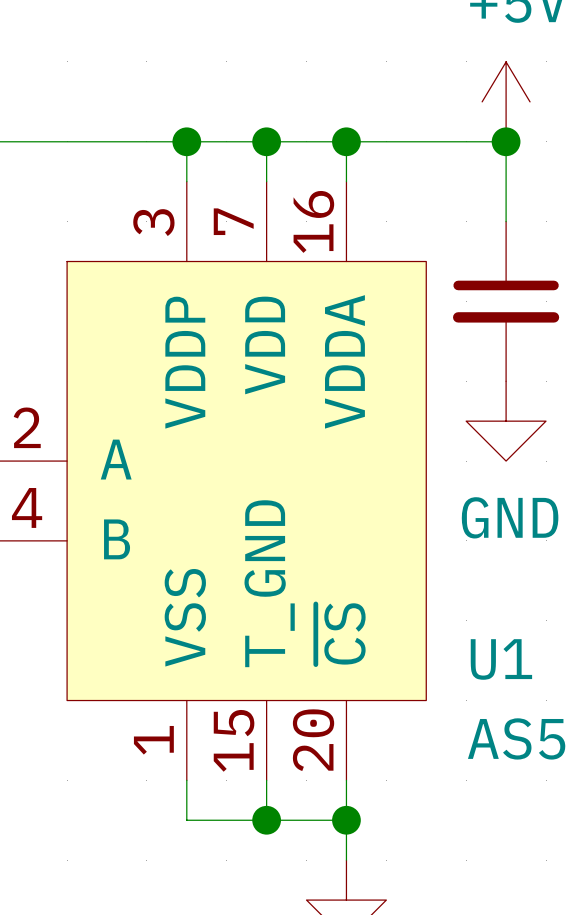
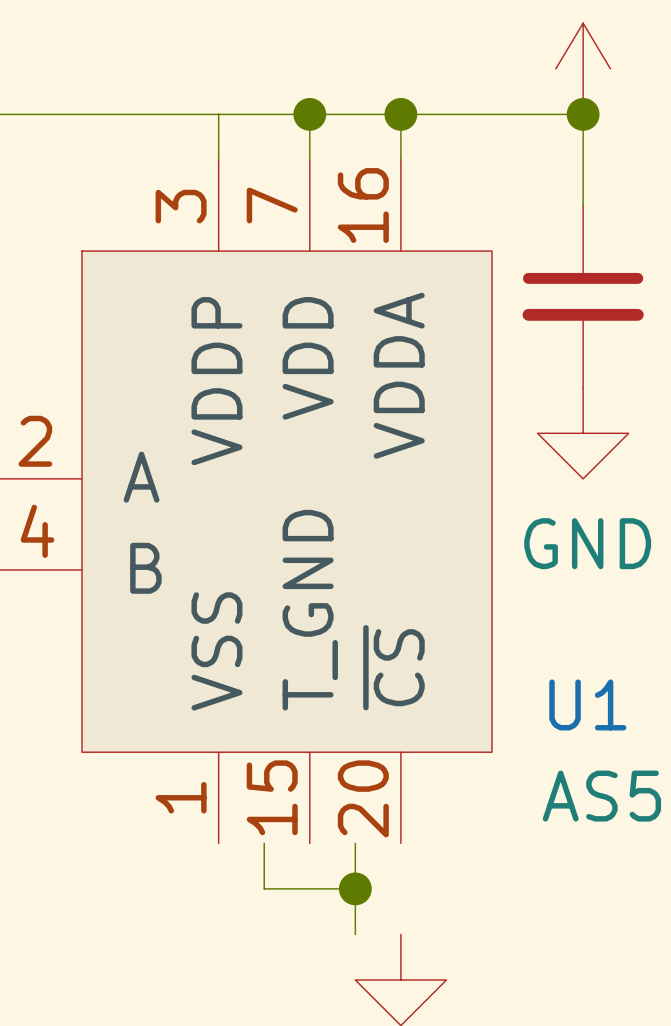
junction: (186, 141) -> none
wire: (186, 780) (186, 820) (226, 820) -> (264, 843) (264, 888)
wire: (266, 780) (266, 820) -> none
wire: (346, 780) (346, 860) -> (355, 843) (355, 934)
junction: (266, 820) -> none
wire: (306, 820) (346, 820) -> none
junction: none -> (355, 888)
junction: (346, 820) -> none

